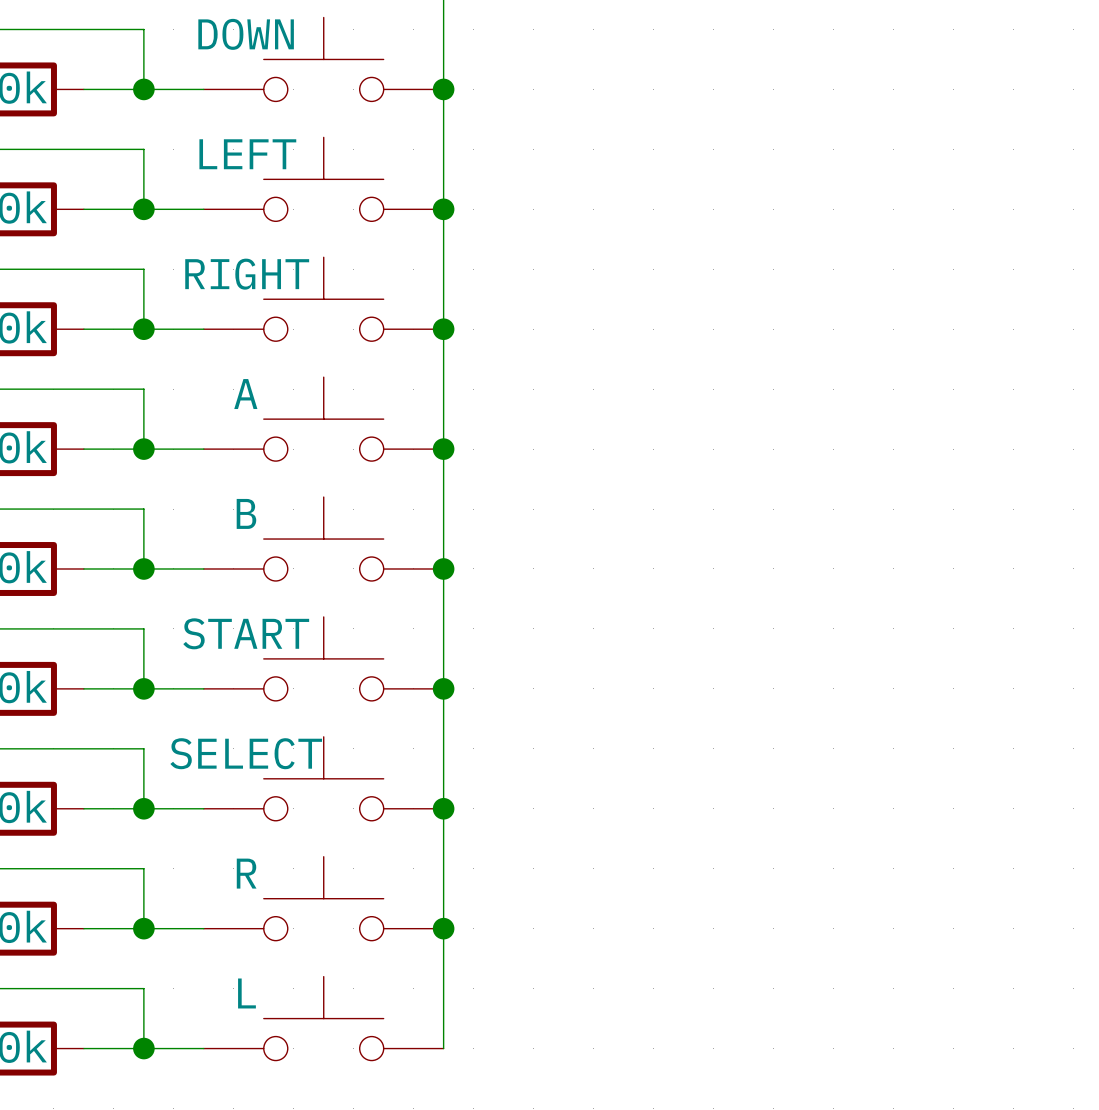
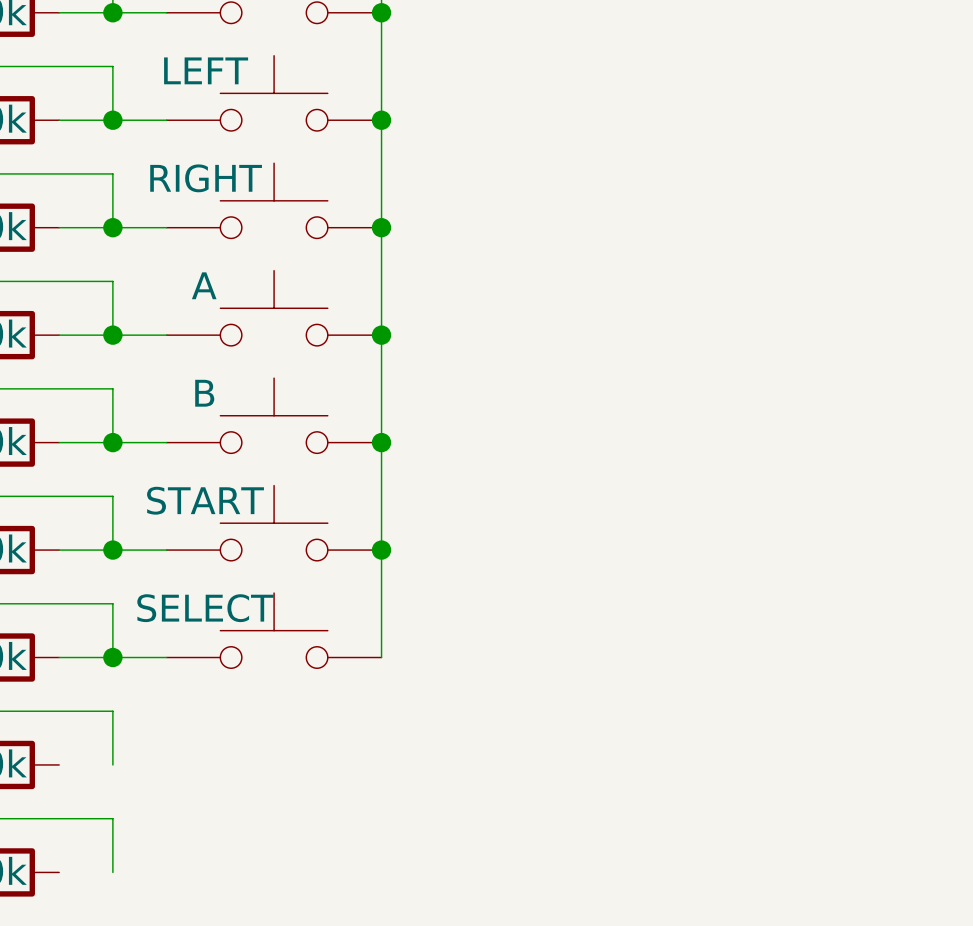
wire: (443, 808) (443, 1048) -> none
junction: (443, 808) -> none
part: R (323, 898) -> none
wire: (83, 928) (203, 928) -> none
junction: (143, 928) -> none
junction: (443, 928) -> none
part: L (323, 1018) -> none
wire: (83, 1048) (203, 1048) -> none
junction: (143, 1048) -> none

